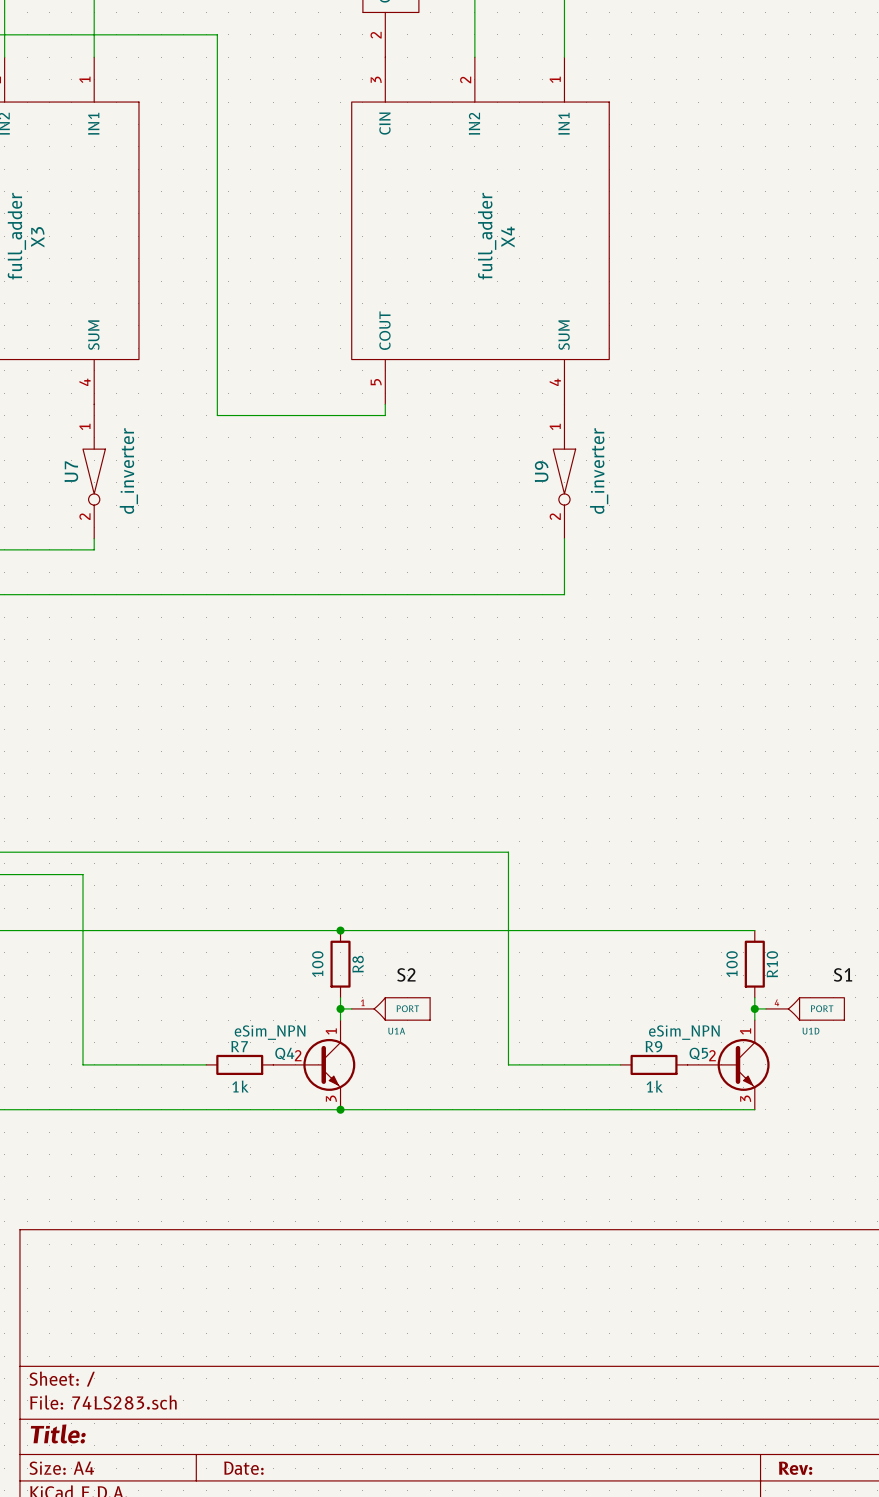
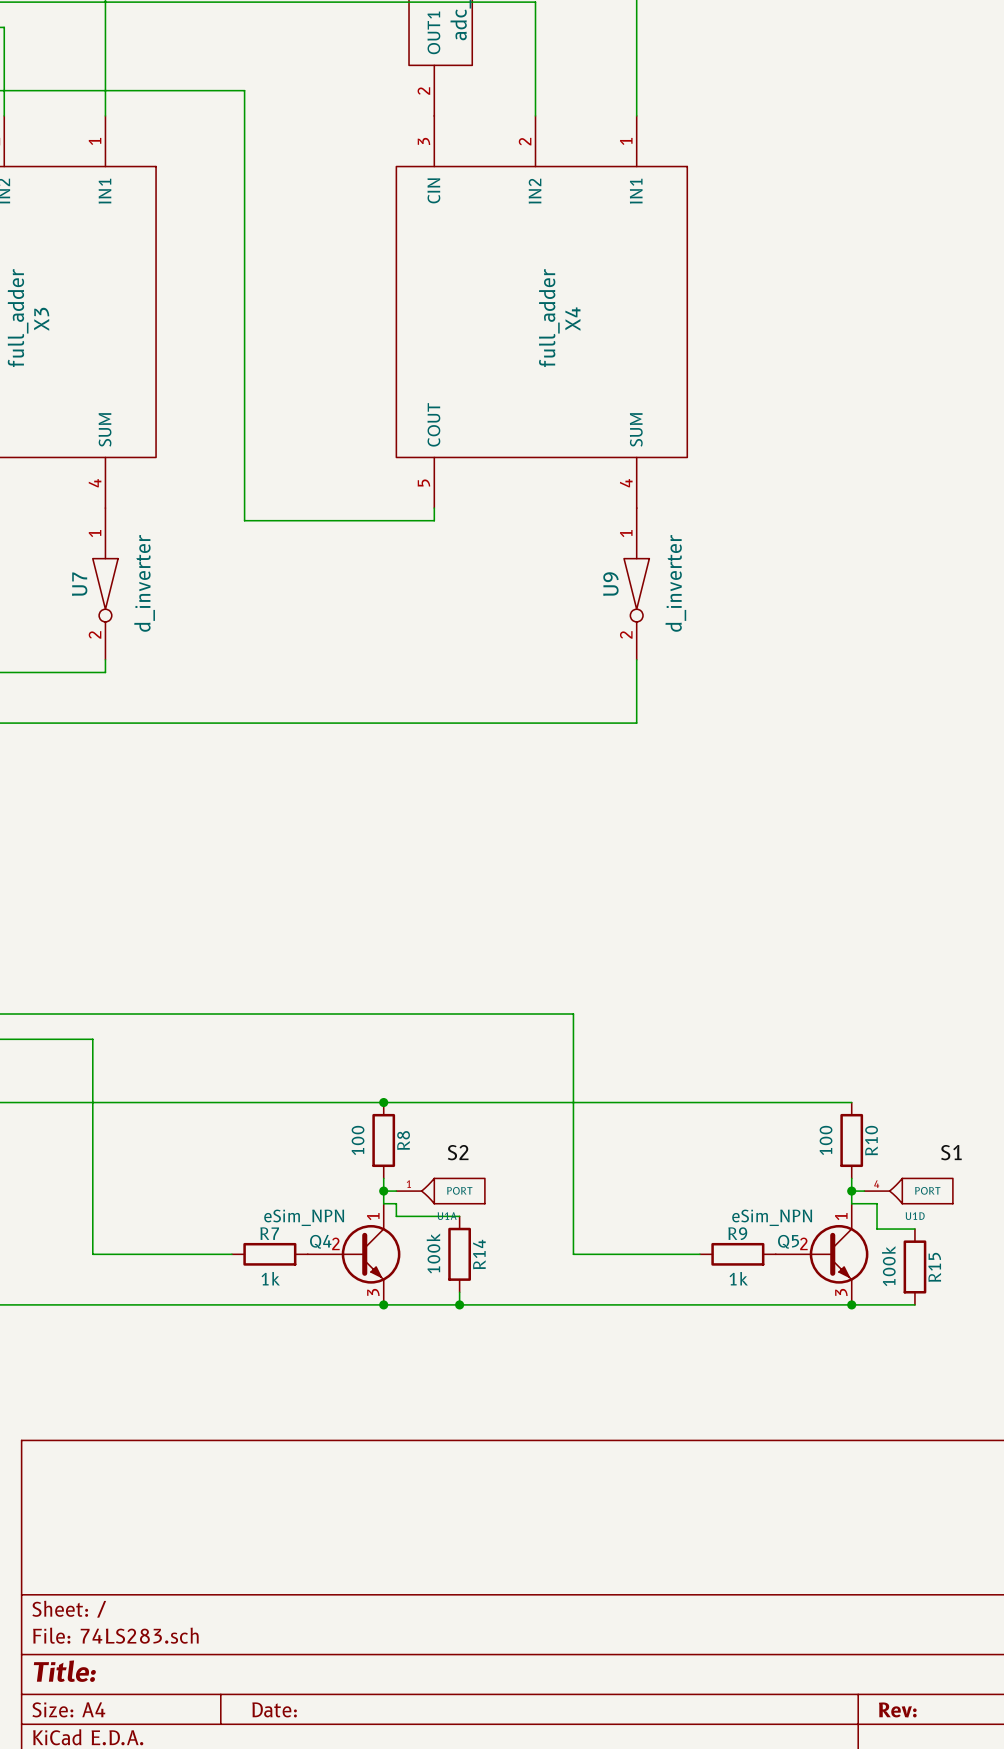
wire: none -> (383, 1203) (396, 1203) (396, 1216) (459, 1216)
wire: none -> (851, 1203) (877, 1203) (877, 1229) (914, 1229)
R14: none -> 100k (459, 1254)
R15: none -> 100k (914, 1266)
wire: none -> (459, 1292) (459, 1304)
junction: none -> (459, 1304)
wire: none -> (851, 1304) (914, 1304)
junction: none -> (851, 1304)

